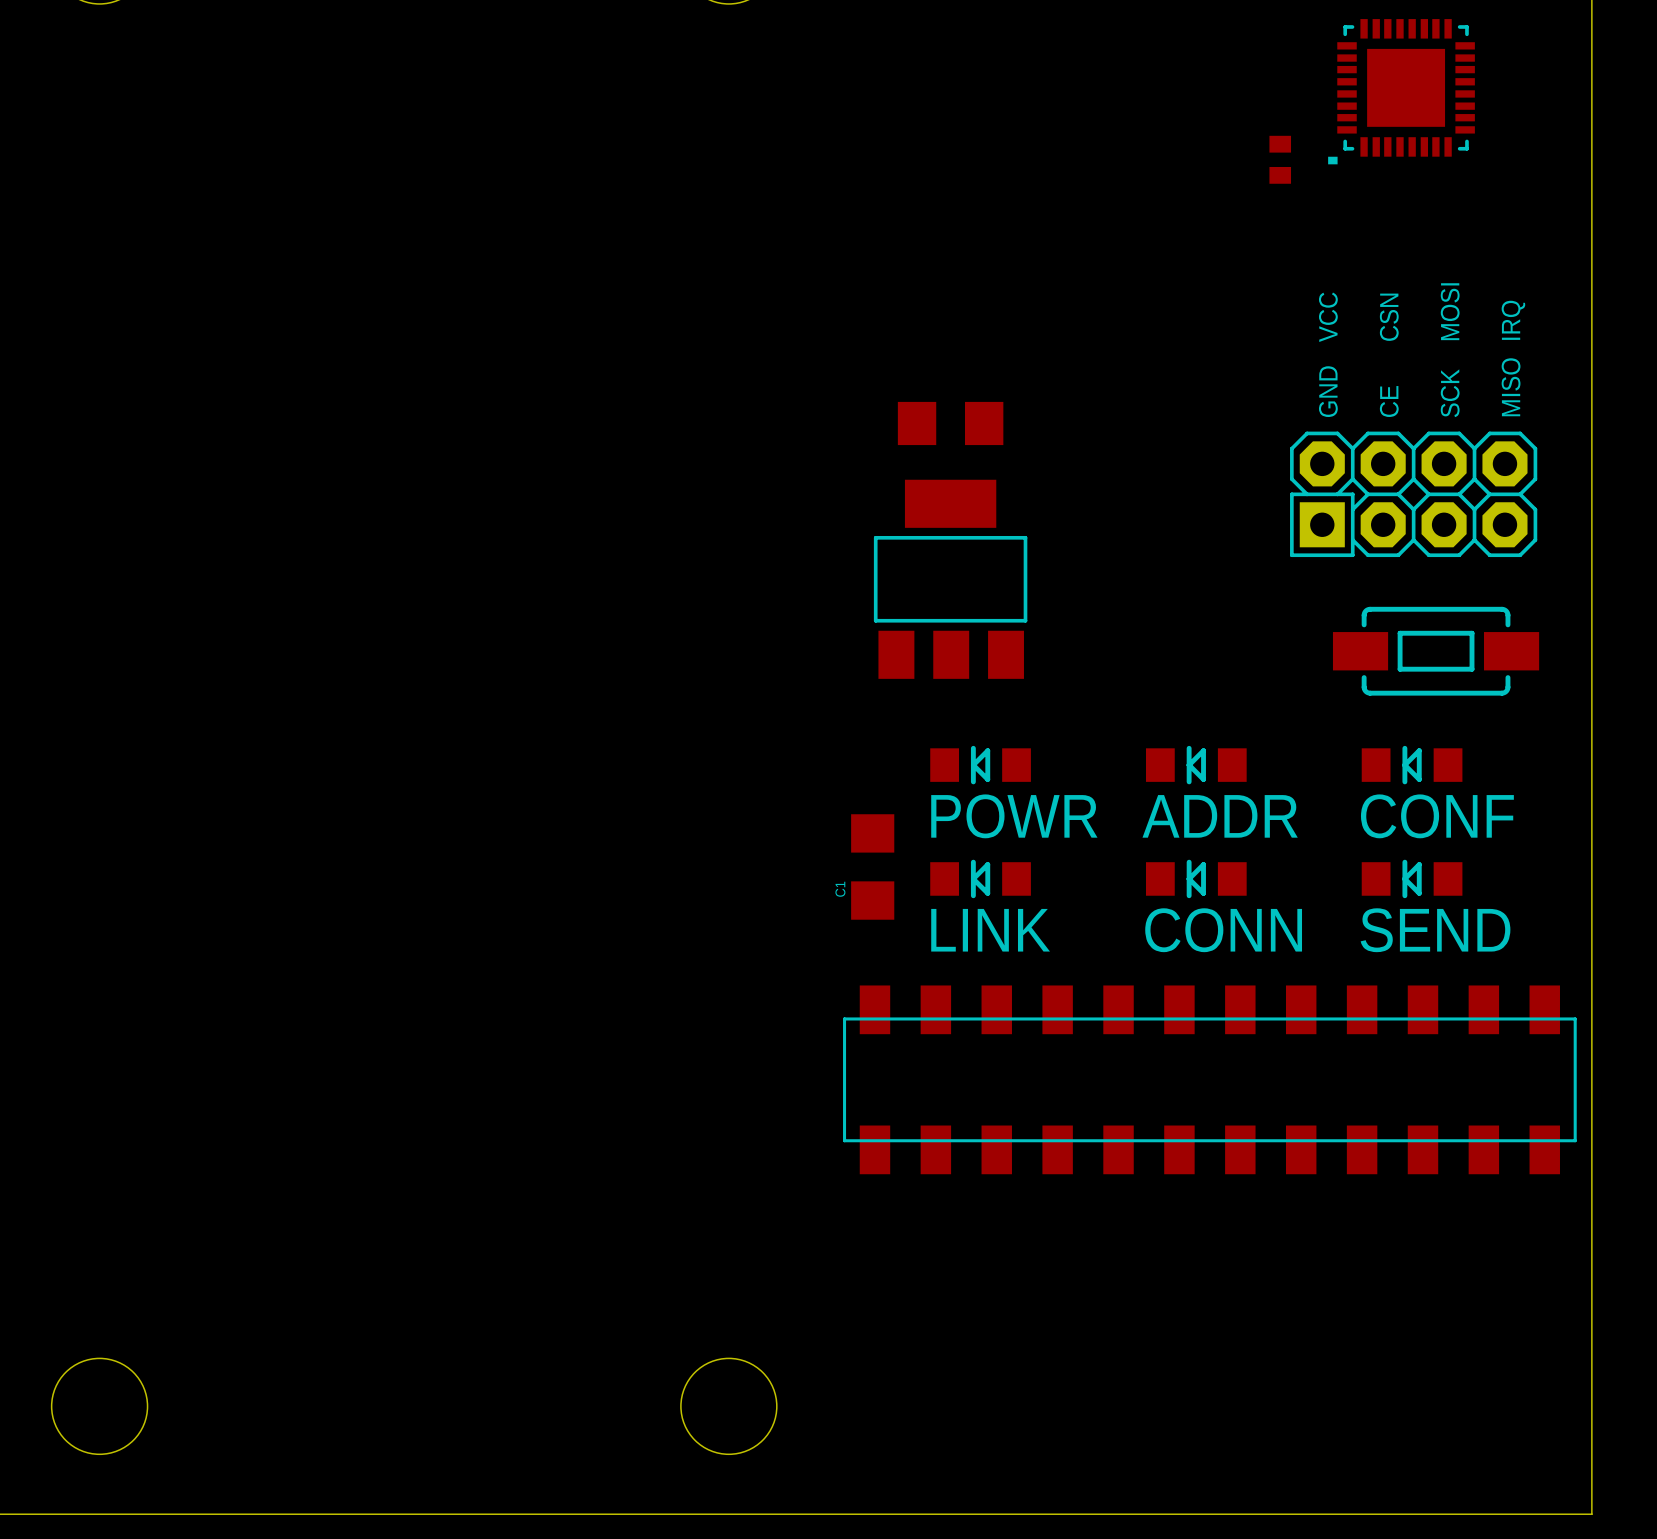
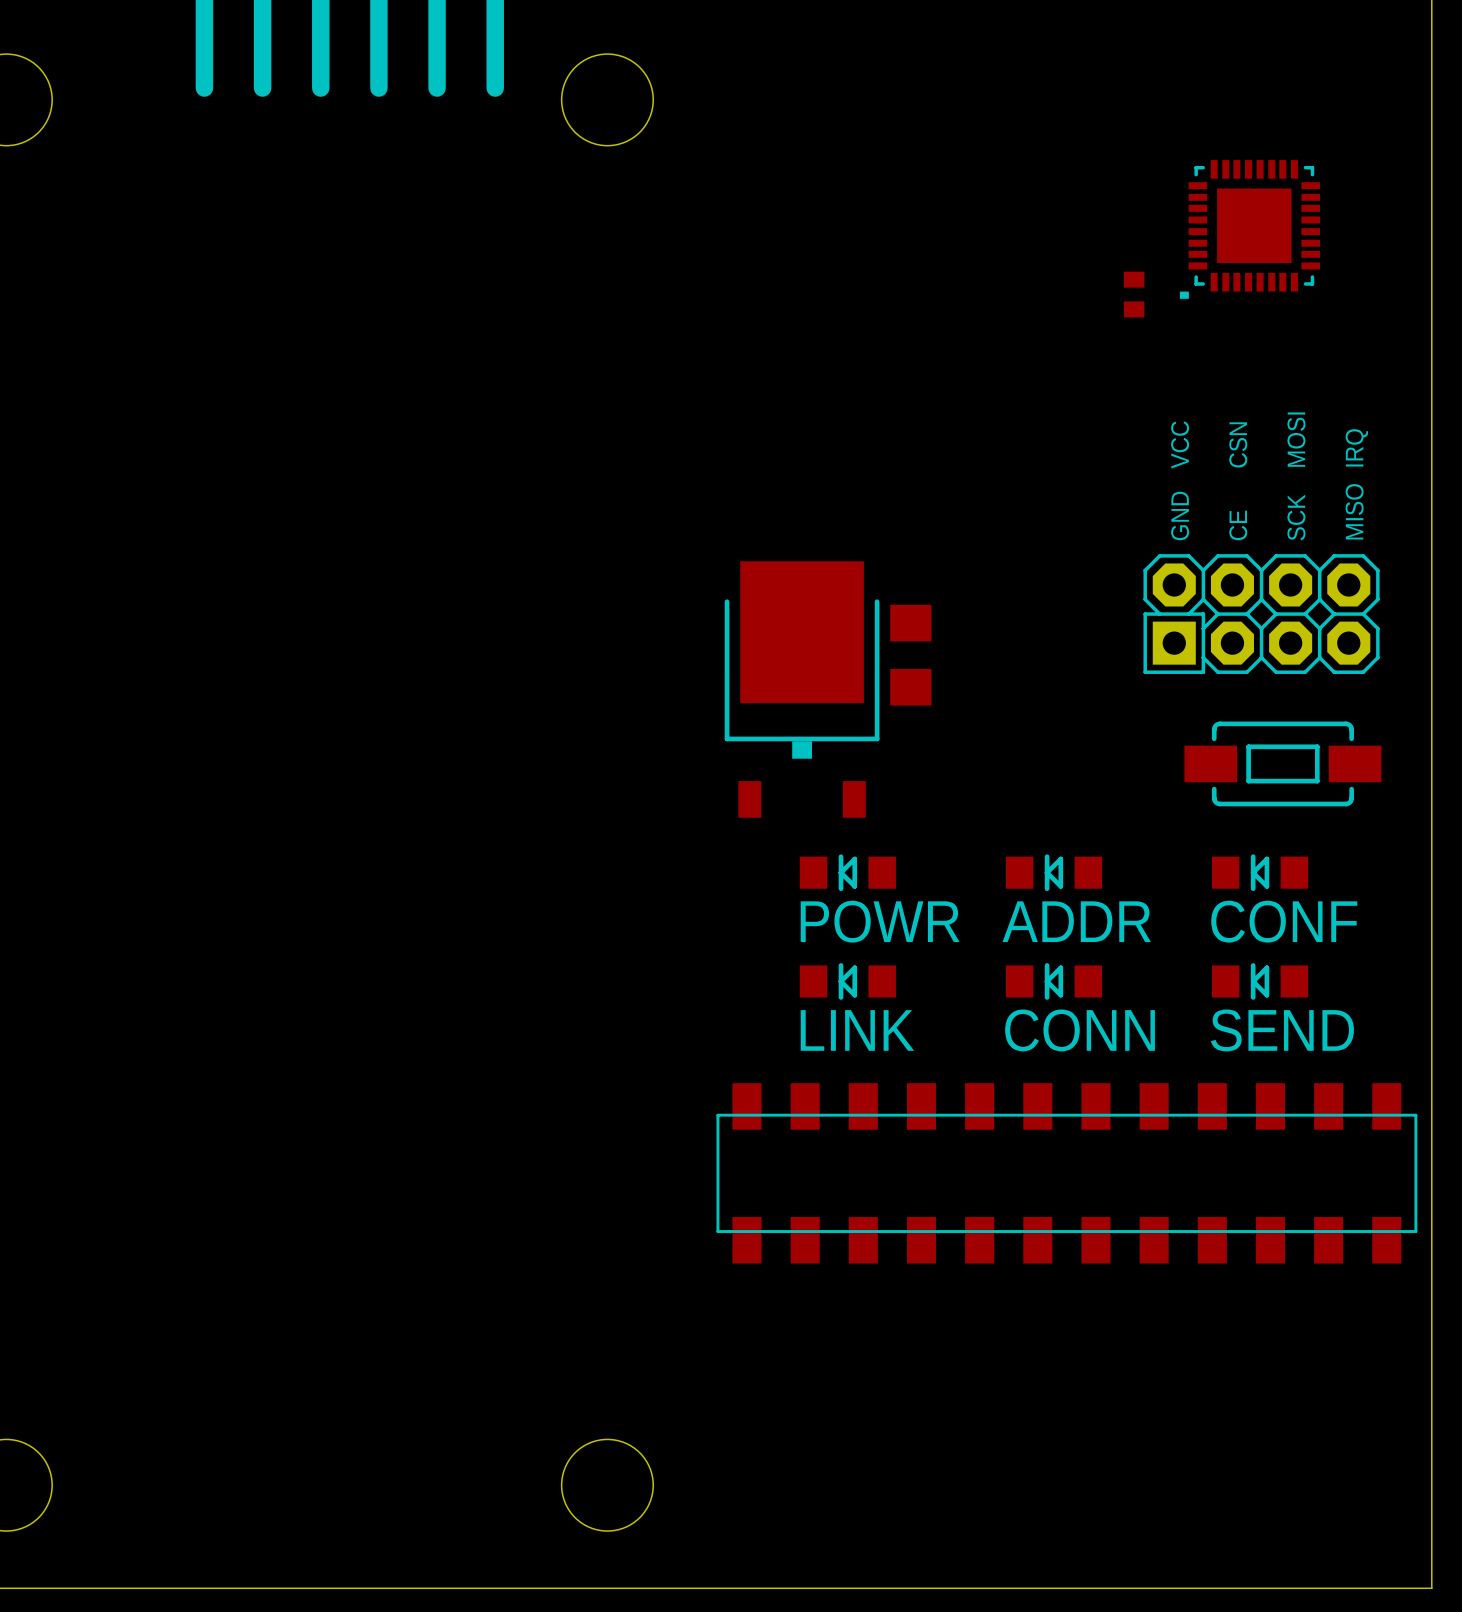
part rotation: 0° (950, 423) -> 90° clockwise (910, 655)
part position: (950, 423) -> (910, 655)
part footprint: [873, 479, 1028, 679] -> [724, 561, 880, 818]
C1: (872, 866) -> none

